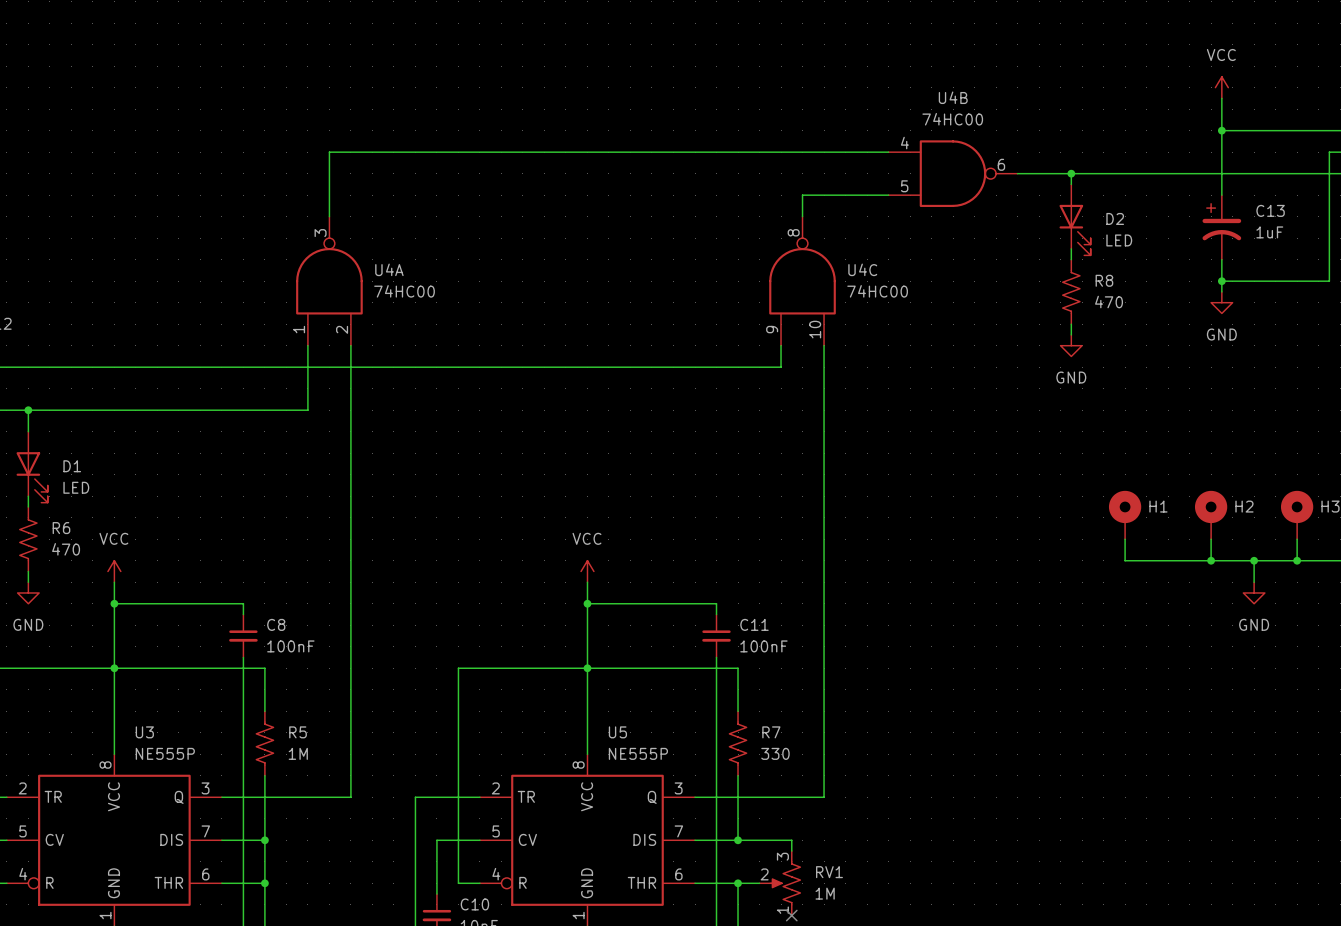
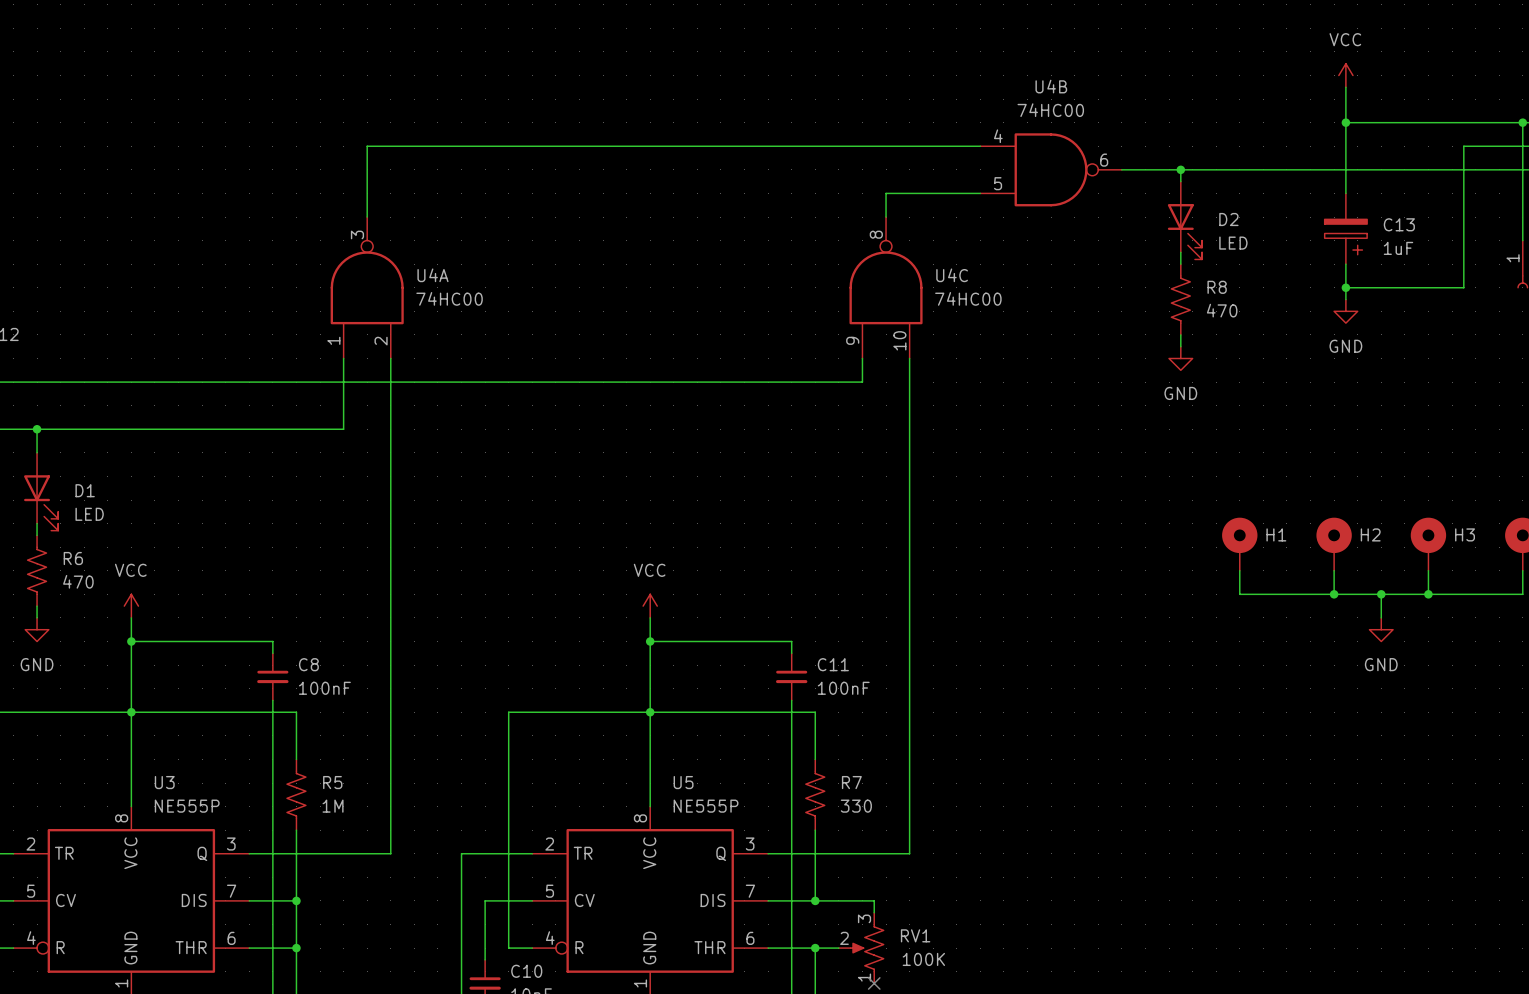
C13 symbol: [1202, 195, 1242, 260] -> [1324, 193, 1368, 265]
RV1 value: 1M (825, 893) -> 100K (923, 959)

